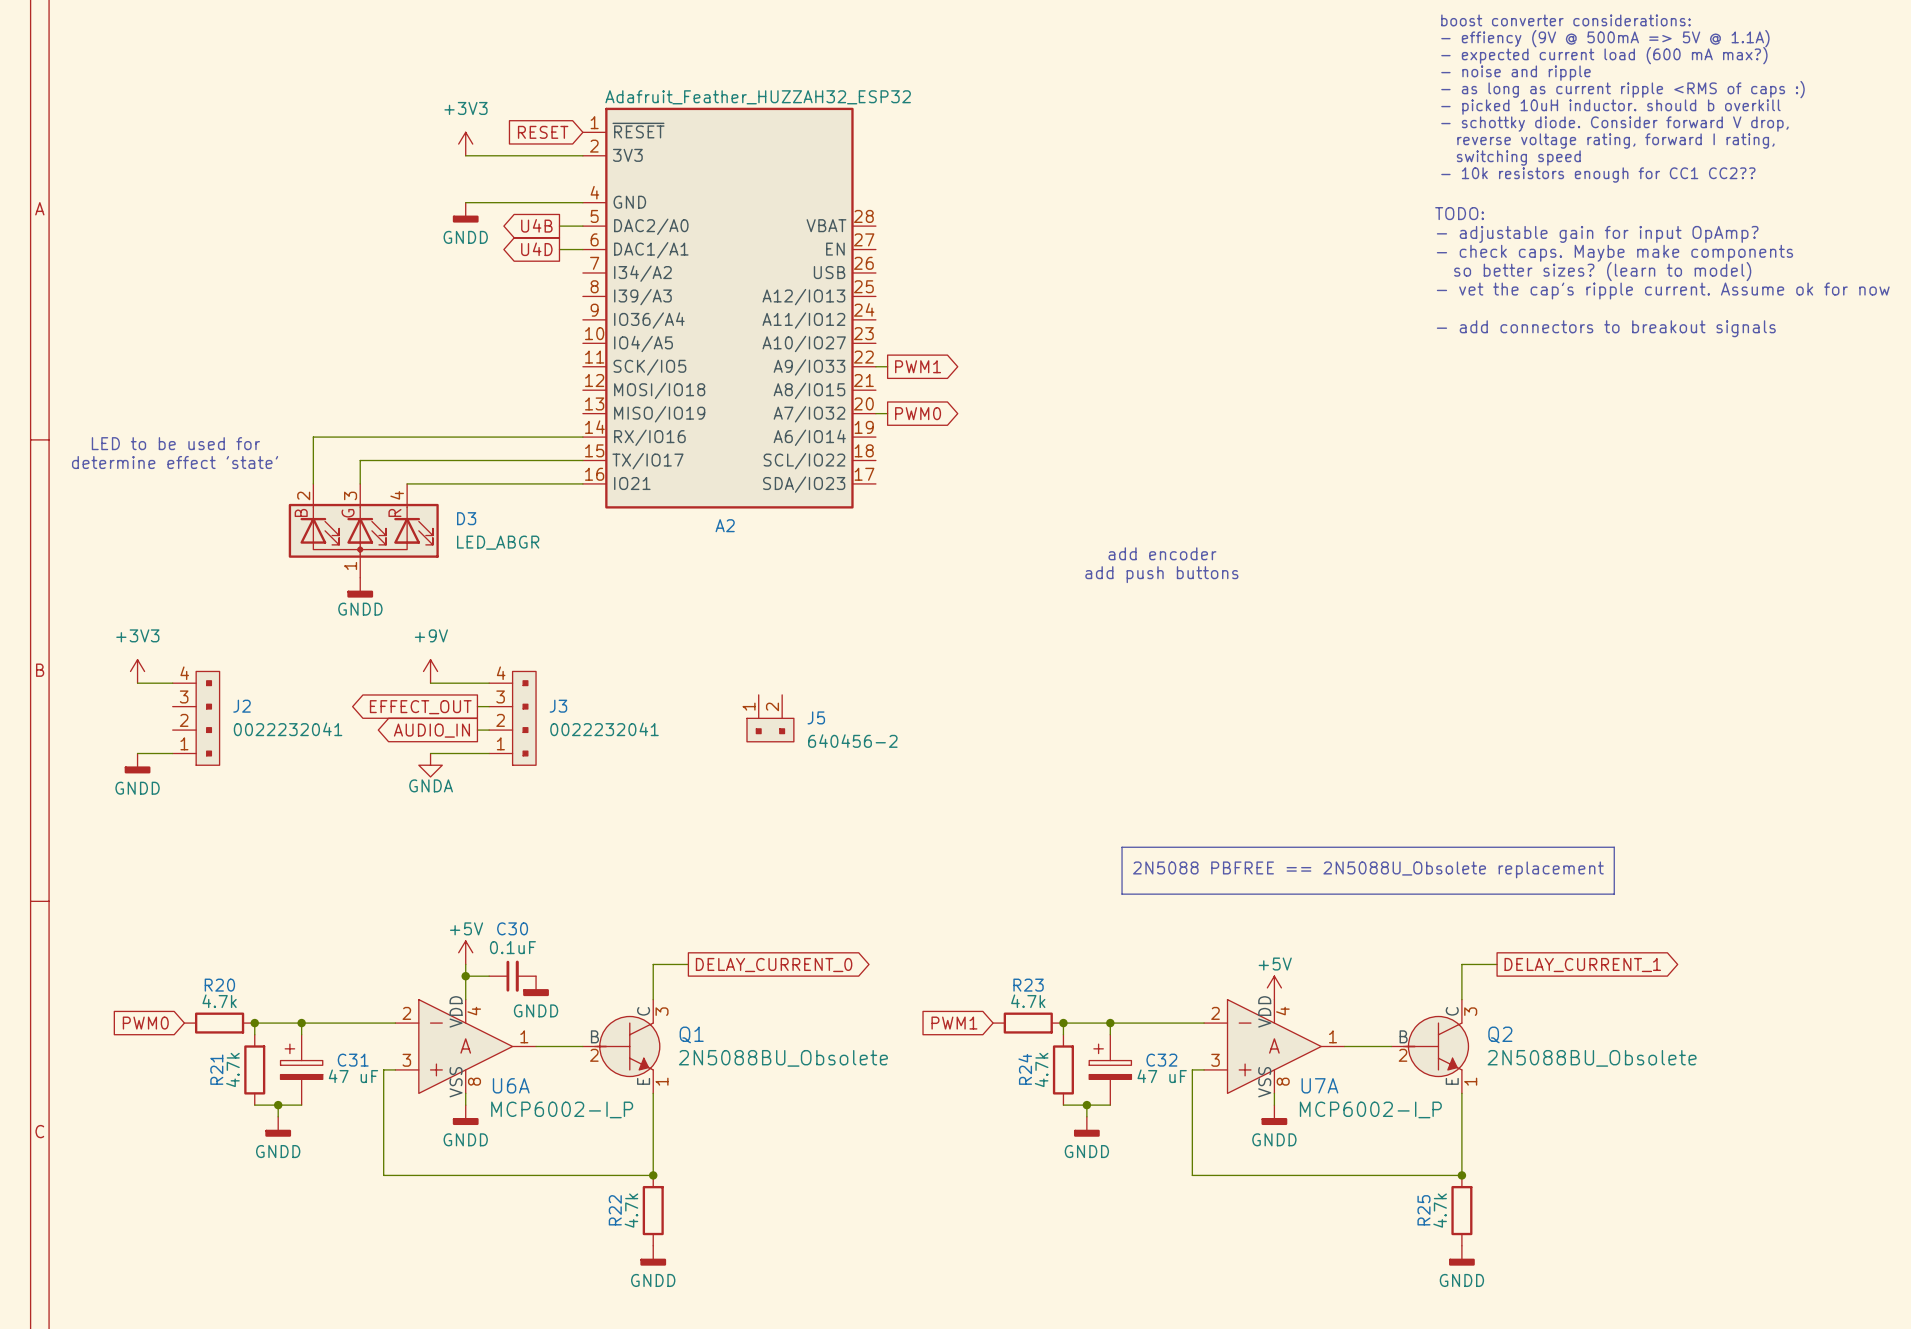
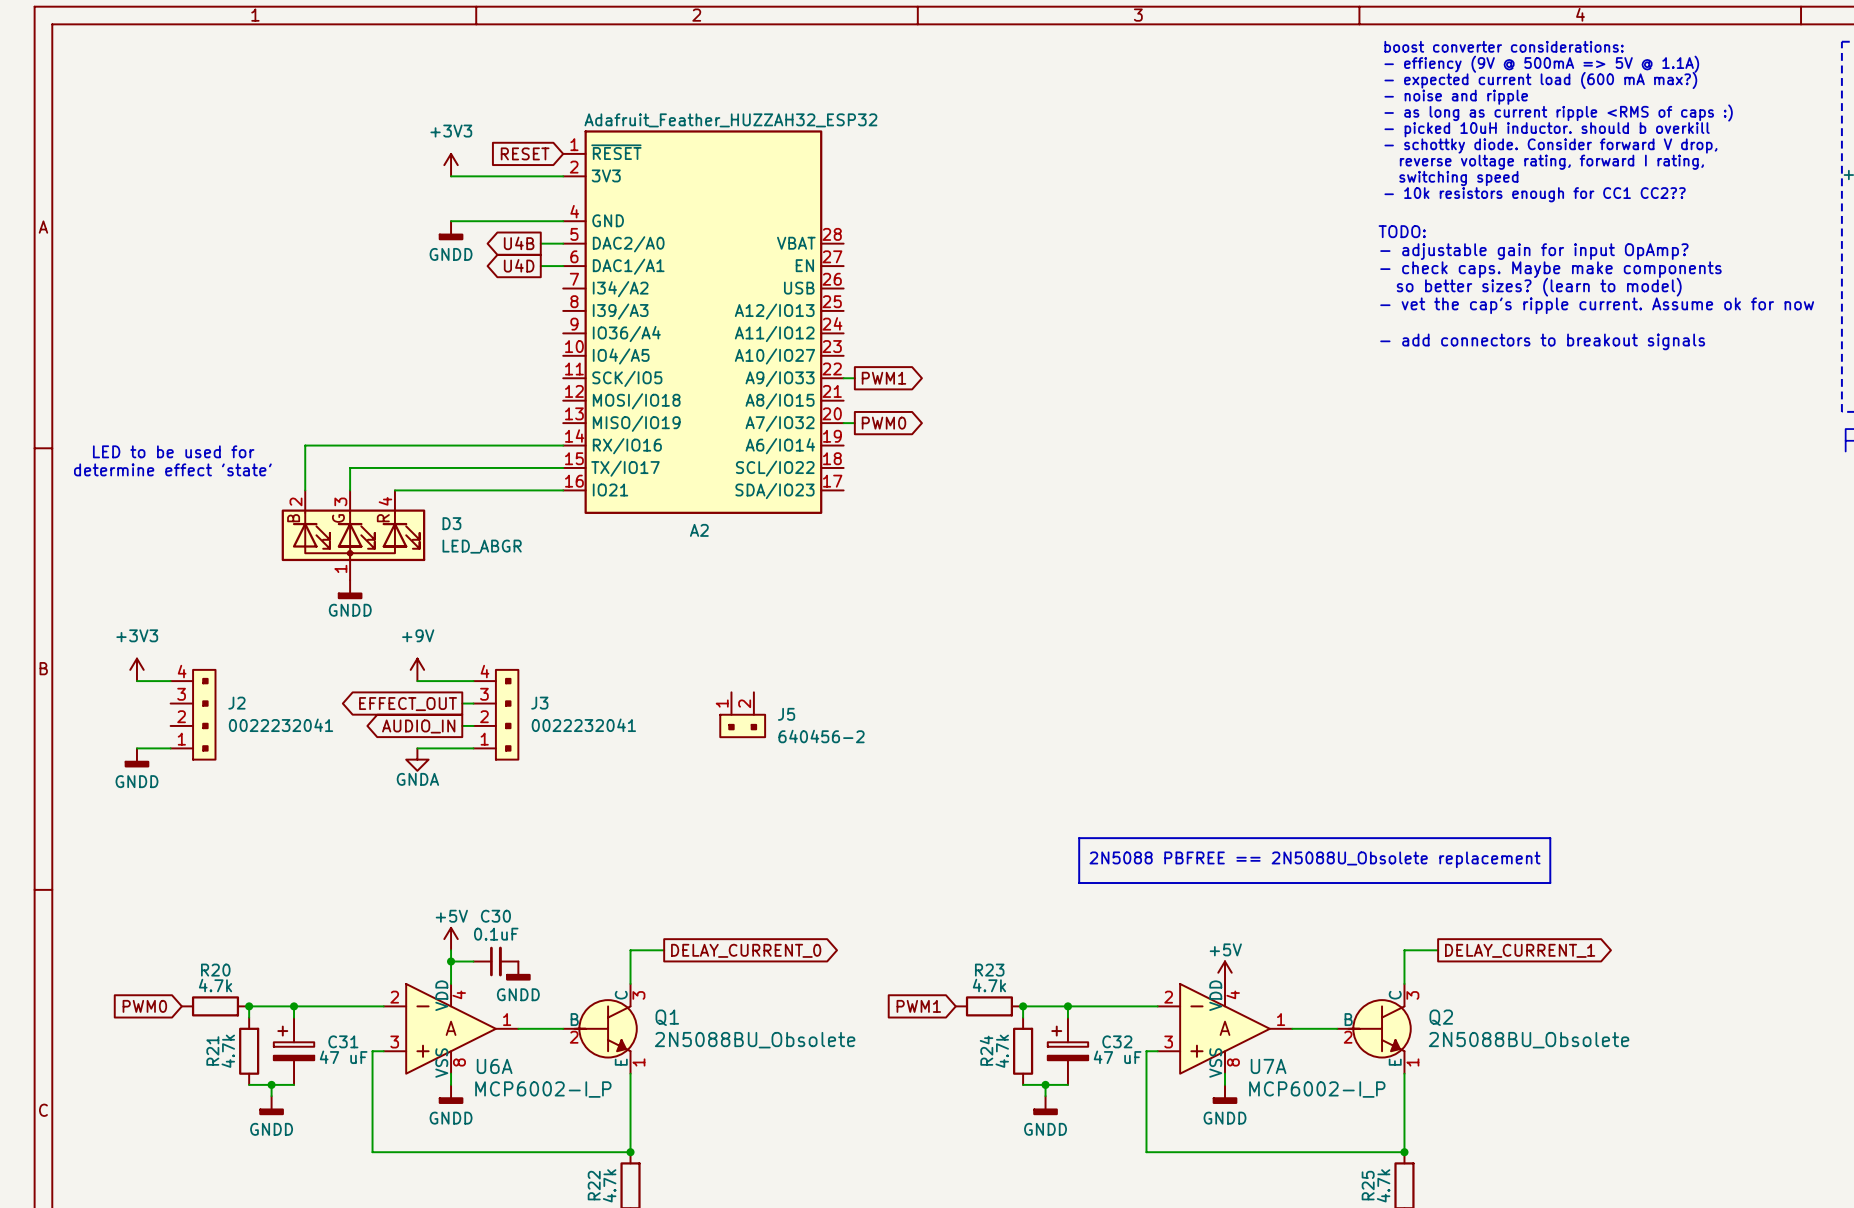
text: add encoder (1162, 553) -> none
text: add push buttons (1161, 574) -> none

